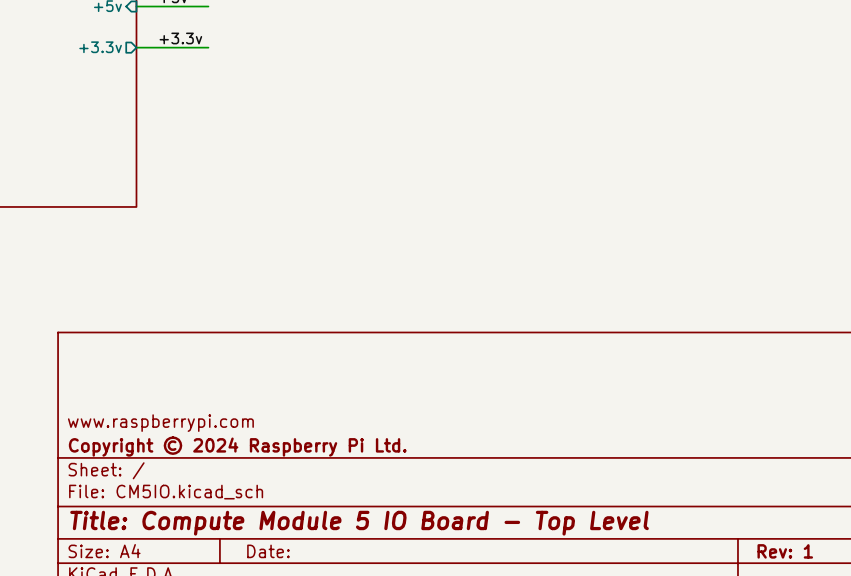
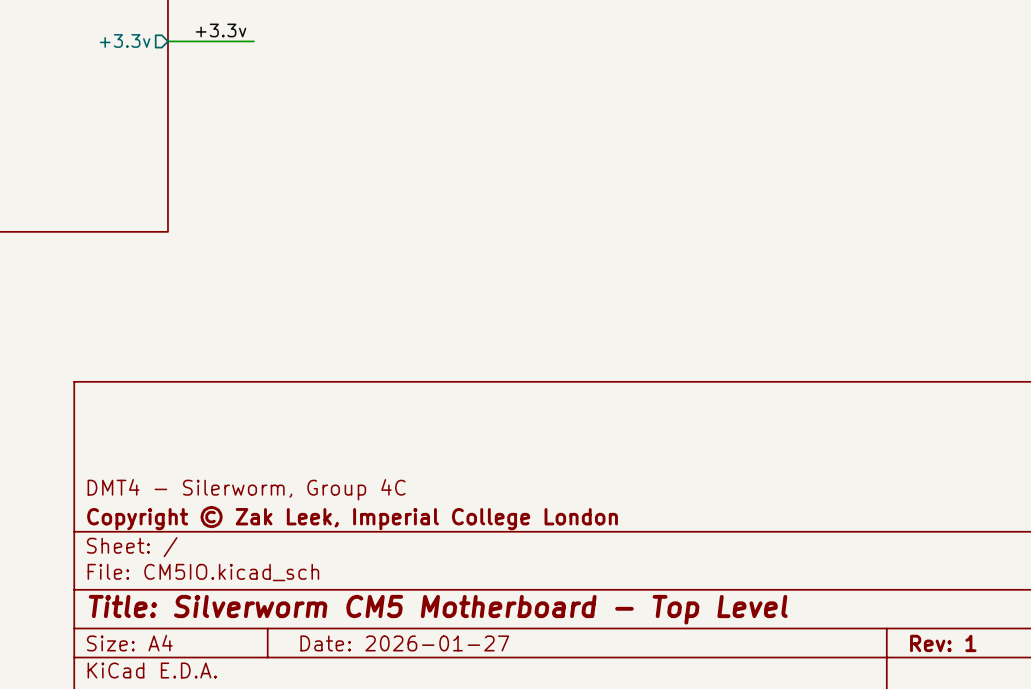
title block: www.raspberrypi.com (160, 423) -> DMT4 - Silerworm, Group 4C (246, 489)
title block: Copyright © 2024 Raspberry Pi Ltd. (237, 446) -> Copyright © Zak Leek, Imperial College London (352, 518)
title block: Title: Compute Module 5 IO Board - Top Level (359, 523) -> Title: Silverworm CM5 Motherboard - Top Level (438, 609)
title block: Date: (268, 551) -> Date: 2026-01-27 (404, 643)

